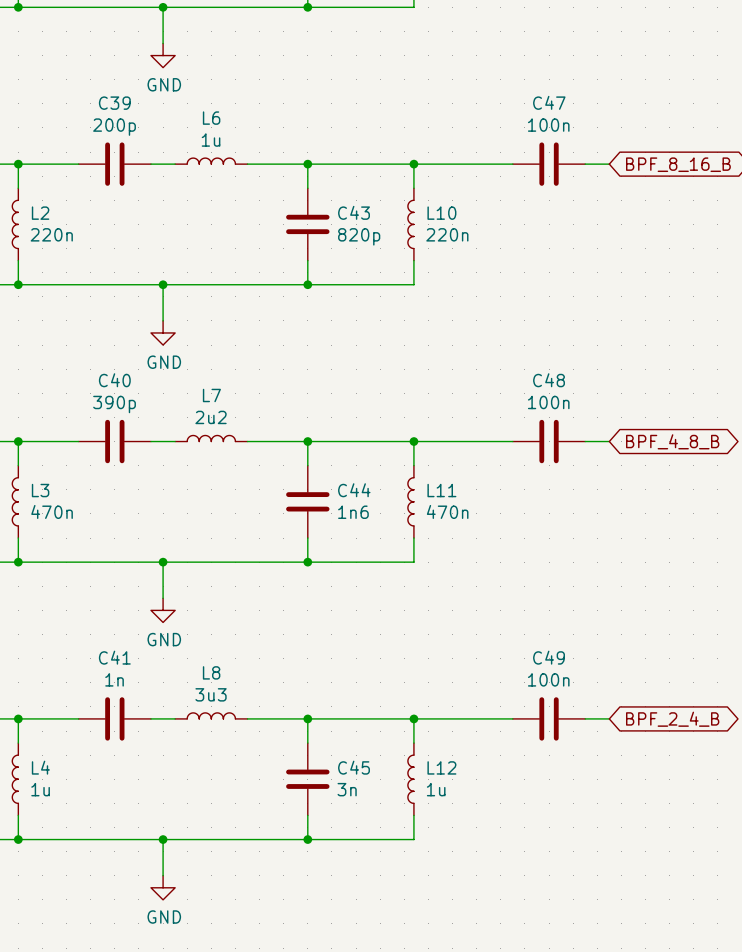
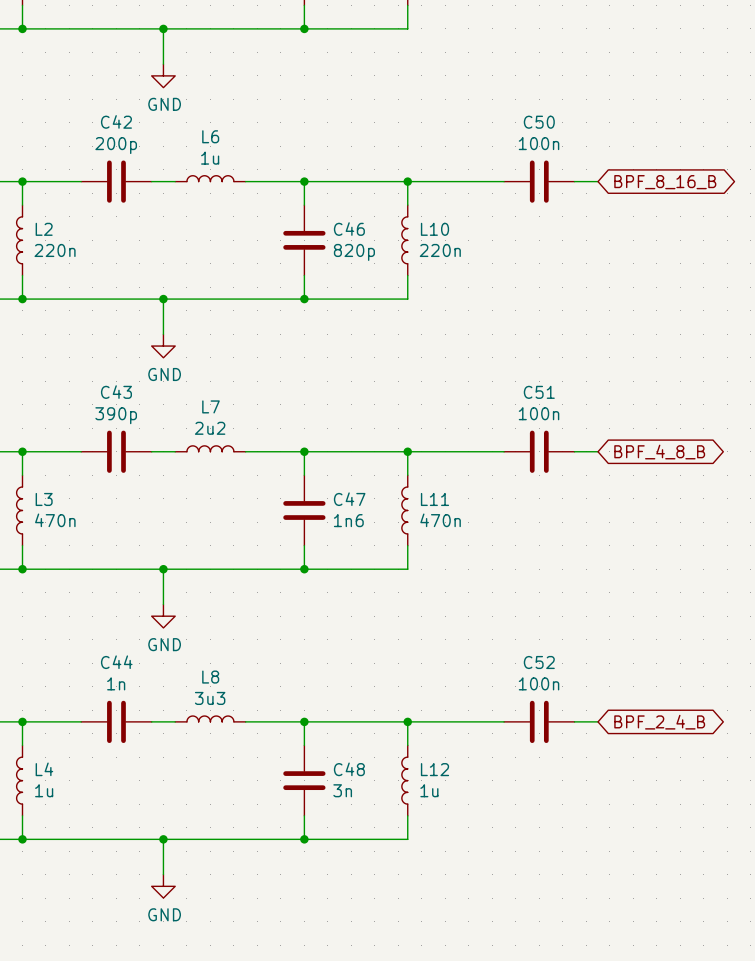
C47 name: C47 (549, 102) -> C50 (539, 122)
C39 name: C39 (114, 103) -> C42 (116, 121)
C43 name: C43 (354, 212) -> C46 (349, 229)
C40 name: C40 (114, 380) -> C43 (116, 392)
C48 name: C48 (549, 380) -> C51 (539, 392)
C44 name: C44 (354, 490) -> C47 (349, 499)
C41 name: C41 (114, 657) -> C44 (116, 662)
C49 name: C49 (549, 657) -> C52 (539, 662)
C45 name: C45 (354, 767) -> C48 (349, 769)

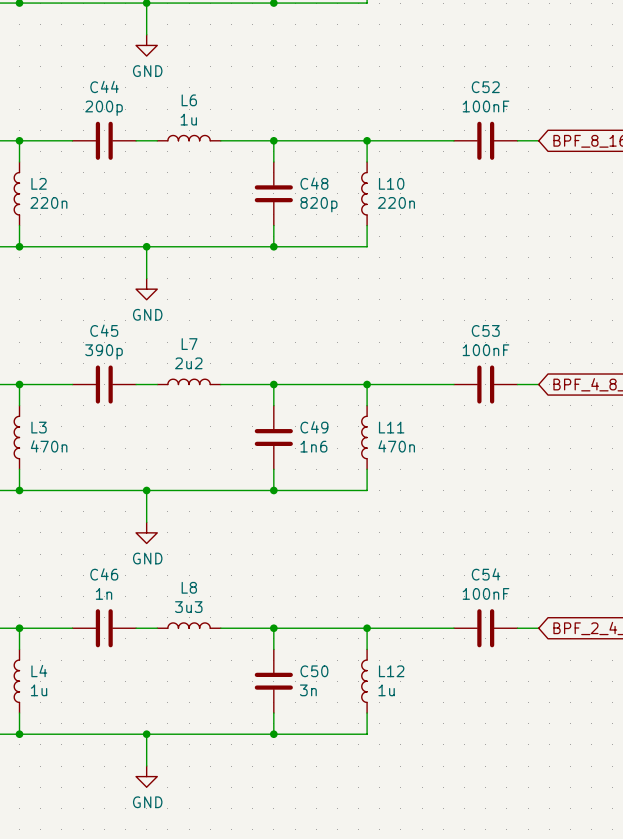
C42 name: C42 (116, 121) -> C44 (104, 86)
C50 name: C50 (539, 122) -> C52 (485, 87)
C50 value: 100n (539, 143) -> 100nF (486, 106)
C46 name: C46 (349, 229) -> C48 (314, 183)
C43 name: C43 (116, 392) -> C45 (104, 330)
C51 name: C51 (539, 392) -> C53 (485, 330)
C51 value: 100n (539, 413) -> 100nF (486, 350)
C47 name: C47 (349, 499) -> C49 (314, 427)
C44 name: C44 (116, 662) -> C46 (104, 574)
C52 name: C52 (539, 662) -> C54 (486, 574)
C52 value: 100n (539, 683) -> 100nF (486, 593)
C48 name: C48 (349, 769) -> C50 (314, 671)

